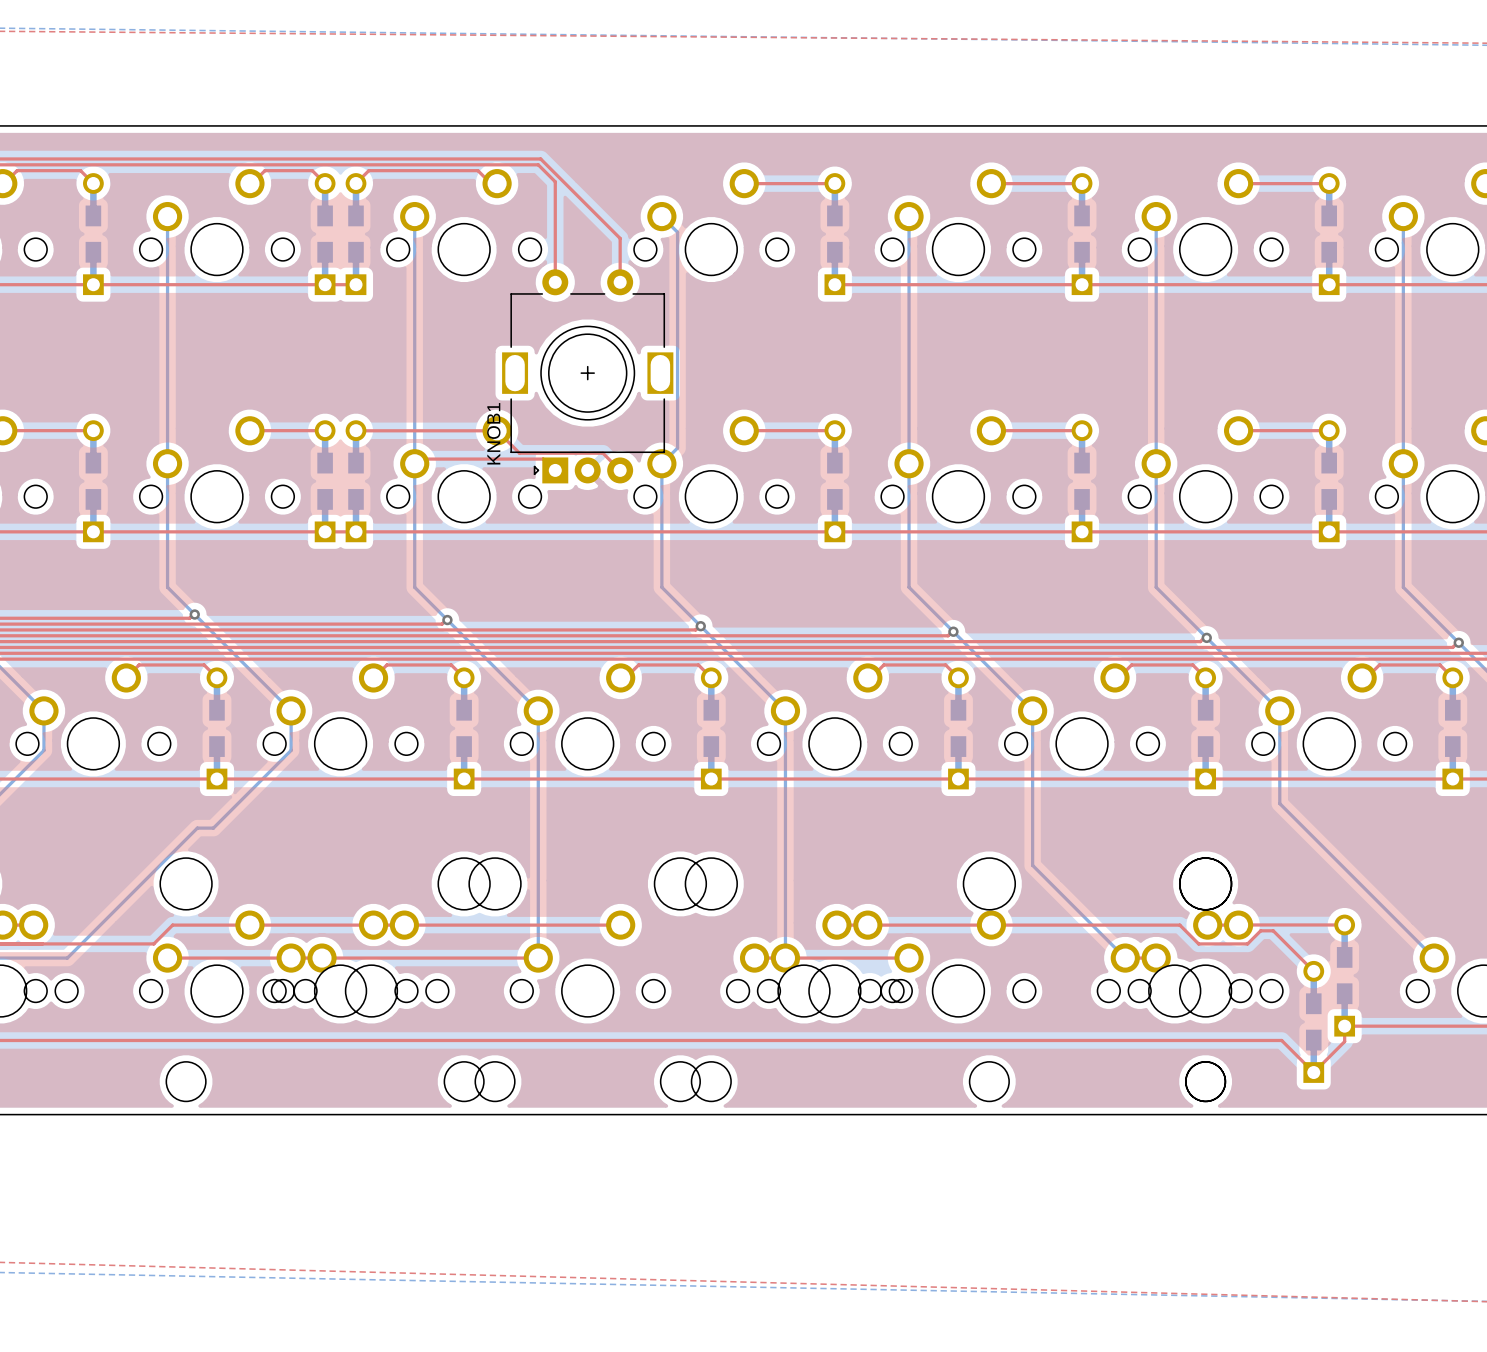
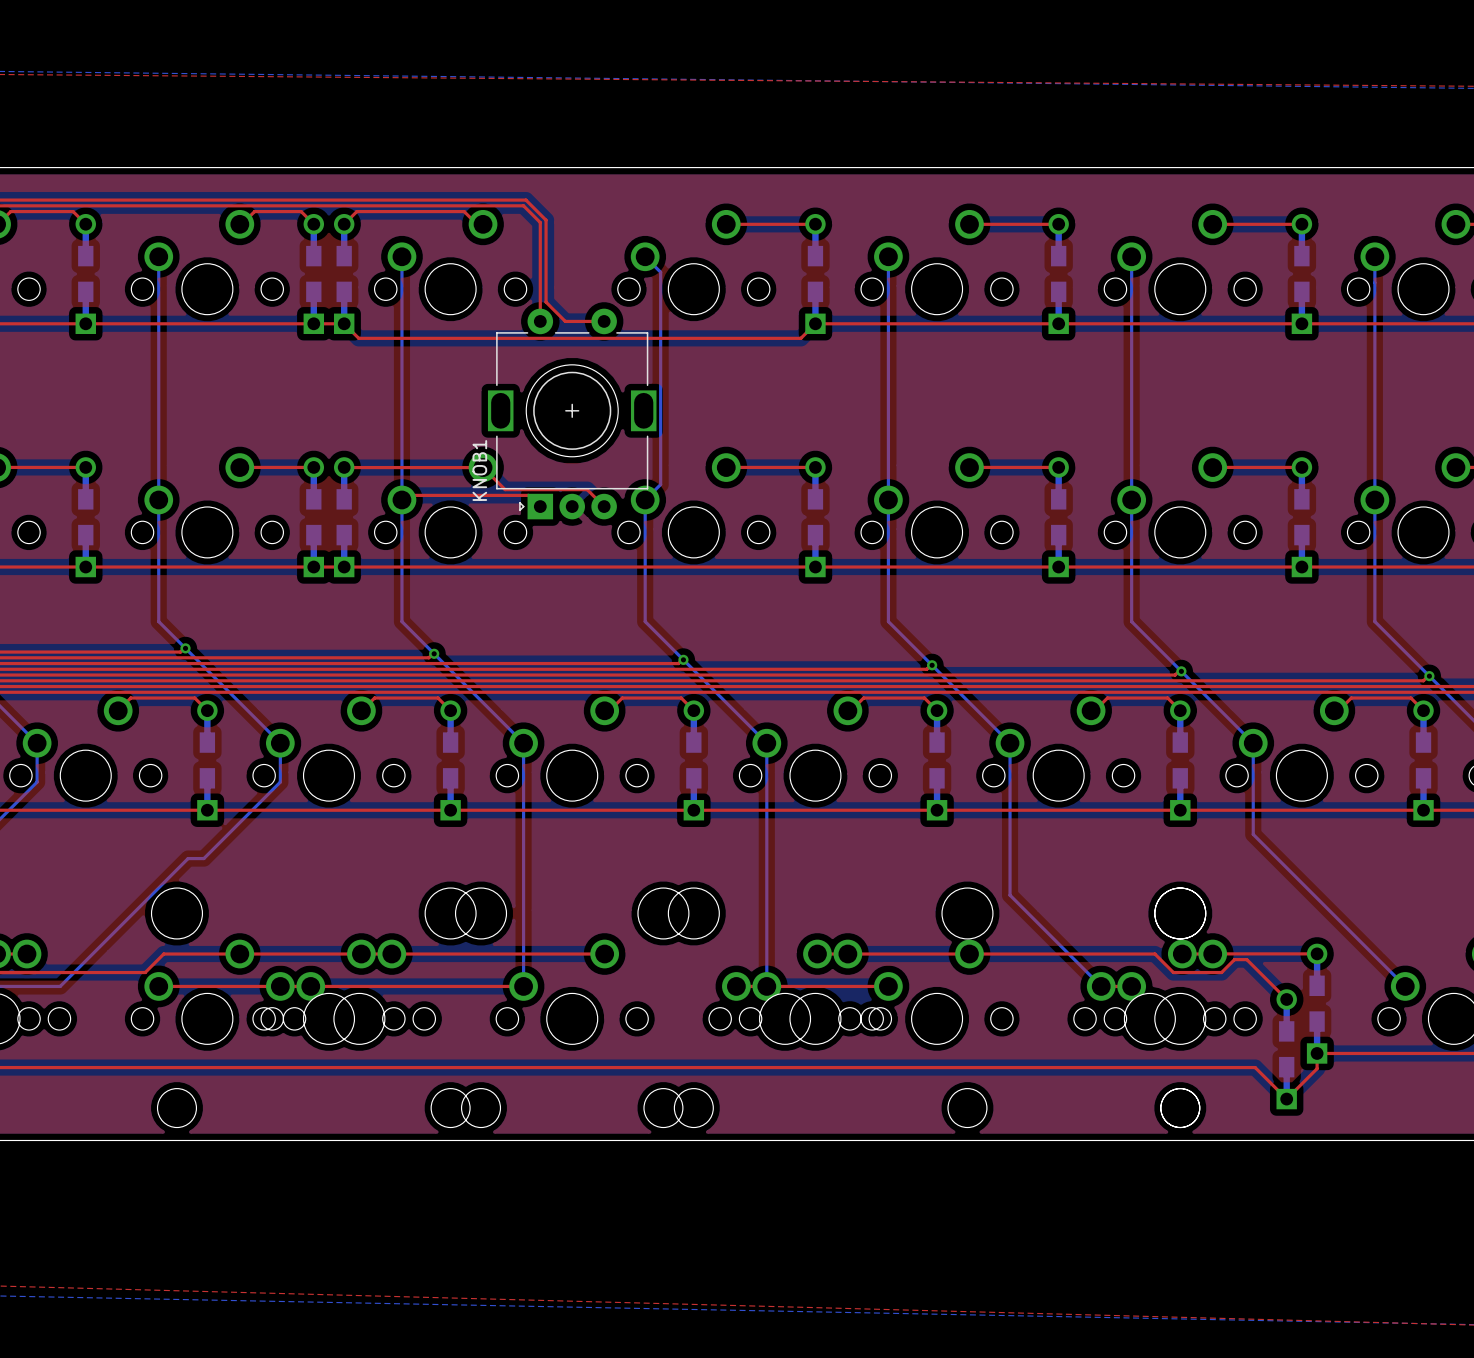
top track: (561, 179) (620, 238) (620, 282) -> (546, 220) (546, 302) (565, 321) (604, 321)
top track: none -> (352, 331) (358, 338) (800, 338) (807, 331)

